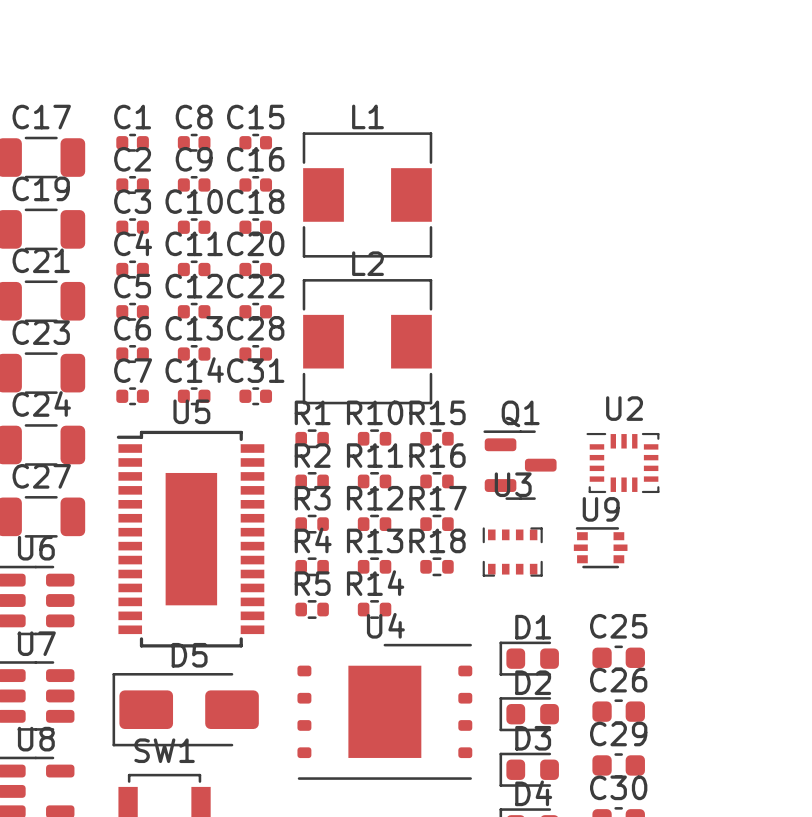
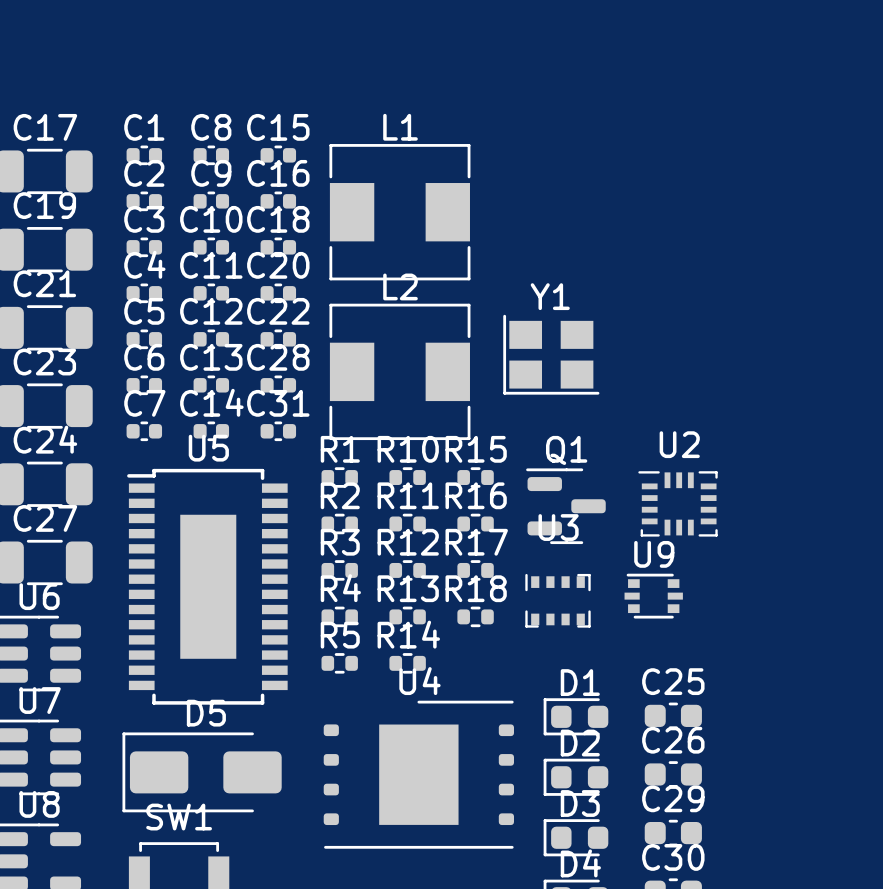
Y1: none -> (551, 354)

